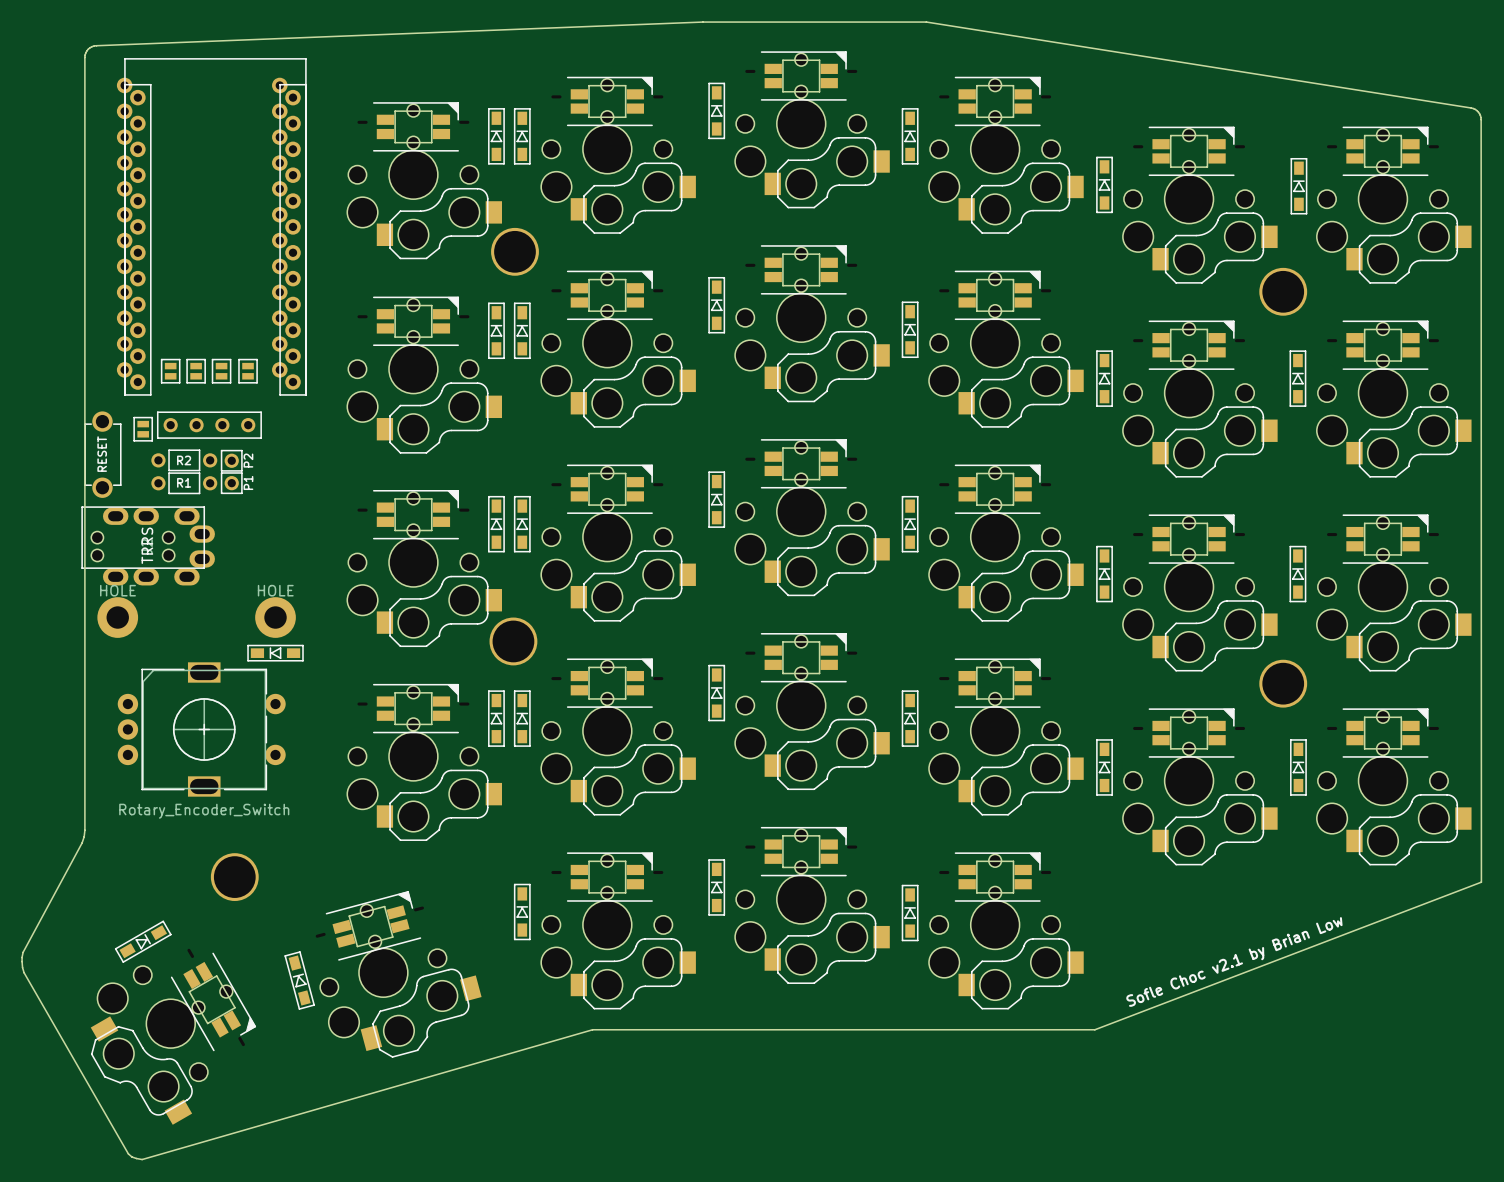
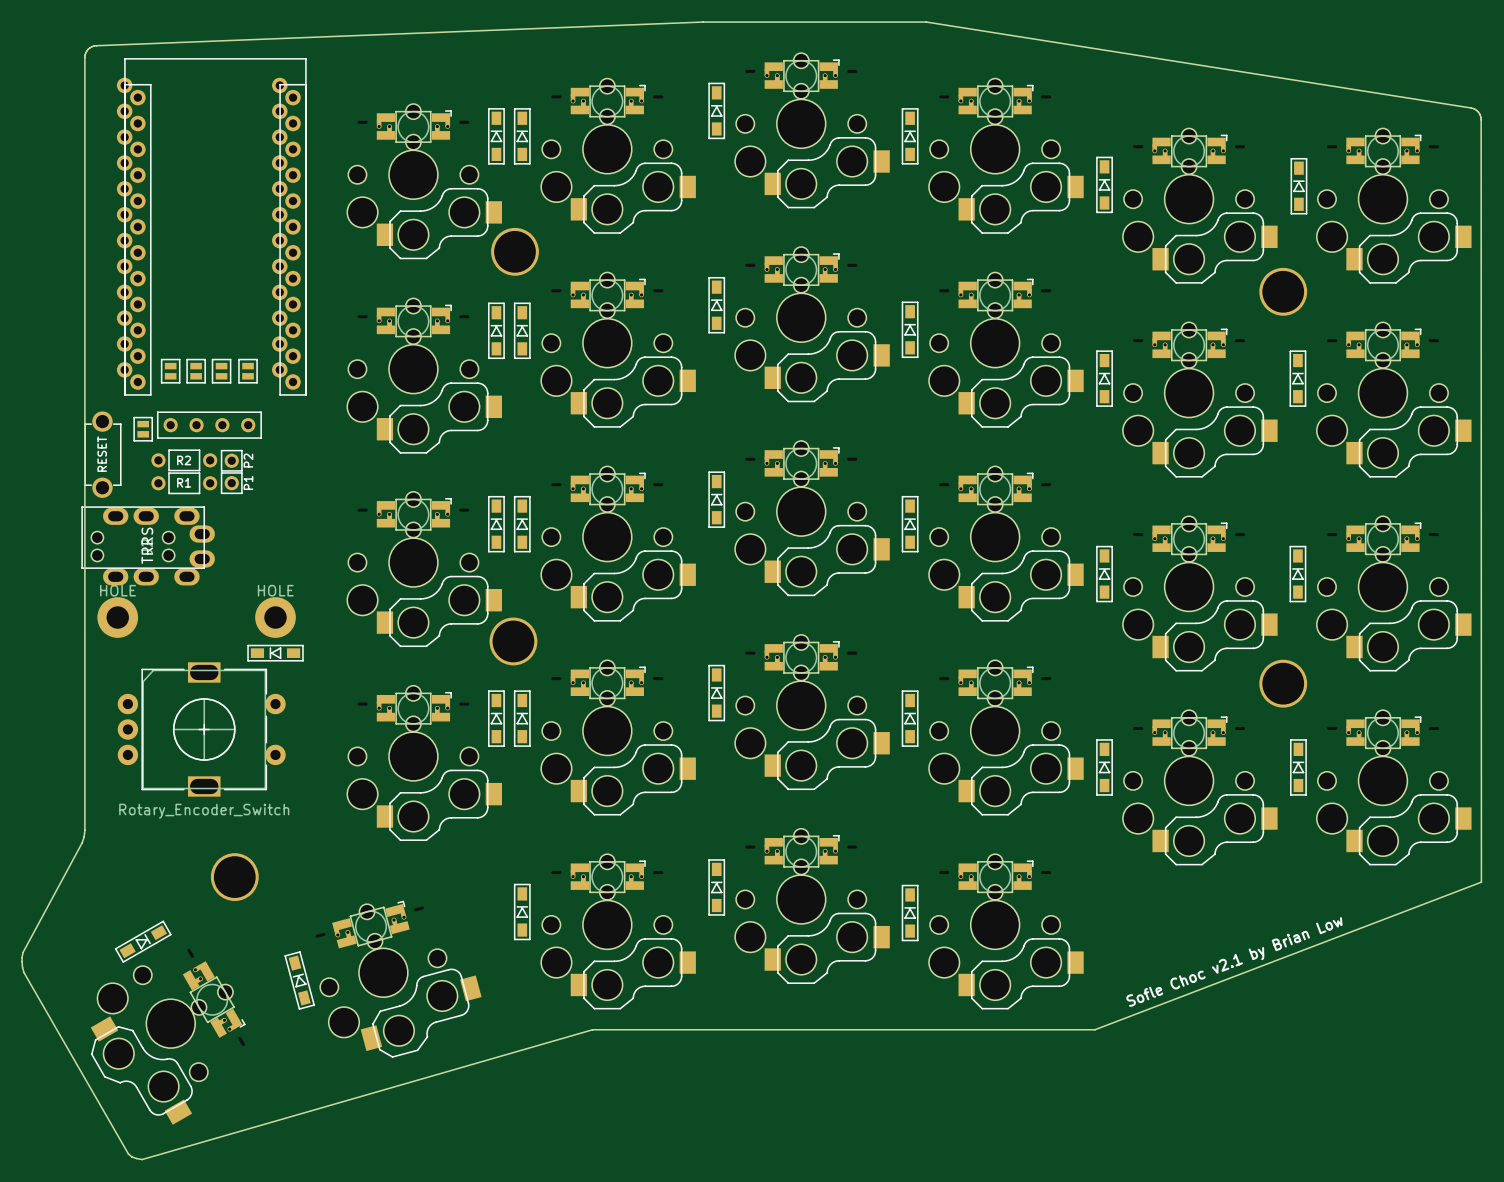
part footprint: [735, 51, 890, 209] -> [735, 53, 890, 209]
part footprint: [541, 76, 696, 234] -> [541, 78, 696, 234]
part footprint: [929, 76, 1084, 234] -> [929, 78, 1084, 234]
part footprint: [347, 102, 502, 260] -> [347, 103, 502, 260]
part footprint: [1122, 126, 1278, 284] -> [1122, 128, 1278, 284]
part footprint: [1316, 126, 1472, 284] -> [1316, 128, 1472, 284]
part footprint: [735, 245, 890, 403] -> [735, 247, 890, 403]
part footprint: [541, 270, 696, 428] -> [541, 272, 696, 428]
part footprint: [929, 270, 1084, 428] -> [929, 272, 1084, 428]
part footprint: [347, 296, 502, 454] -> [347, 298, 502, 454]
part footprint: [1122, 320, 1278, 478] -> [1122, 322, 1278, 478]
part footprint: [1316, 320, 1472, 478] -> [1316, 322, 1472, 478]
part footprint: [735, 439, 890, 597] -> [735, 440, 890, 597]
part footprint: [541, 464, 696, 622] -> [541, 466, 696, 622]
part footprint: [929, 464, 1084, 622] -> [929, 466, 1084, 622]
part footprint: [347, 490, 502, 648] -> [347, 491, 502, 648]
part footprint: [1122, 514, 1278, 672] -> [1122, 516, 1278, 672]
part footprint: [1316, 514, 1472, 672] -> [1316, 516, 1472, 672]
part footprint: [735, 633, 890, 791] -> [735, 634, 890, 791]
part footprint: [541, 658, 696, 816] -> [541, 660, 696, 816]
part footprint: [929, 658, 1084, 816] -> [929, 660, 1084, 816]
part footprint: [347, 684, 502, 841] -> [347, 685, 502, 841]
part footprint: [1122, 708, 1278, 866] -> [1122, 710, 1278, 866]
part footprint: [1316, 708, 1472, 866] -> [1316, 710, 1472, 866]
part footprint: [735, 827, 890, 984] -> [735, 828, 890, 984]
part footprint: [541, 852, 696, 1010] -> [541, 854, 696, 1010]
part footprint: [929, 852, 1084, 1010] -> [929, 854, 1084, 1010]
part footprint: [315, 891, 482, 1058] -> [315, 900, 482, 1058]
part footprint: [90, 948, 256, 1125] -> [90, 948, 246, 1125]

